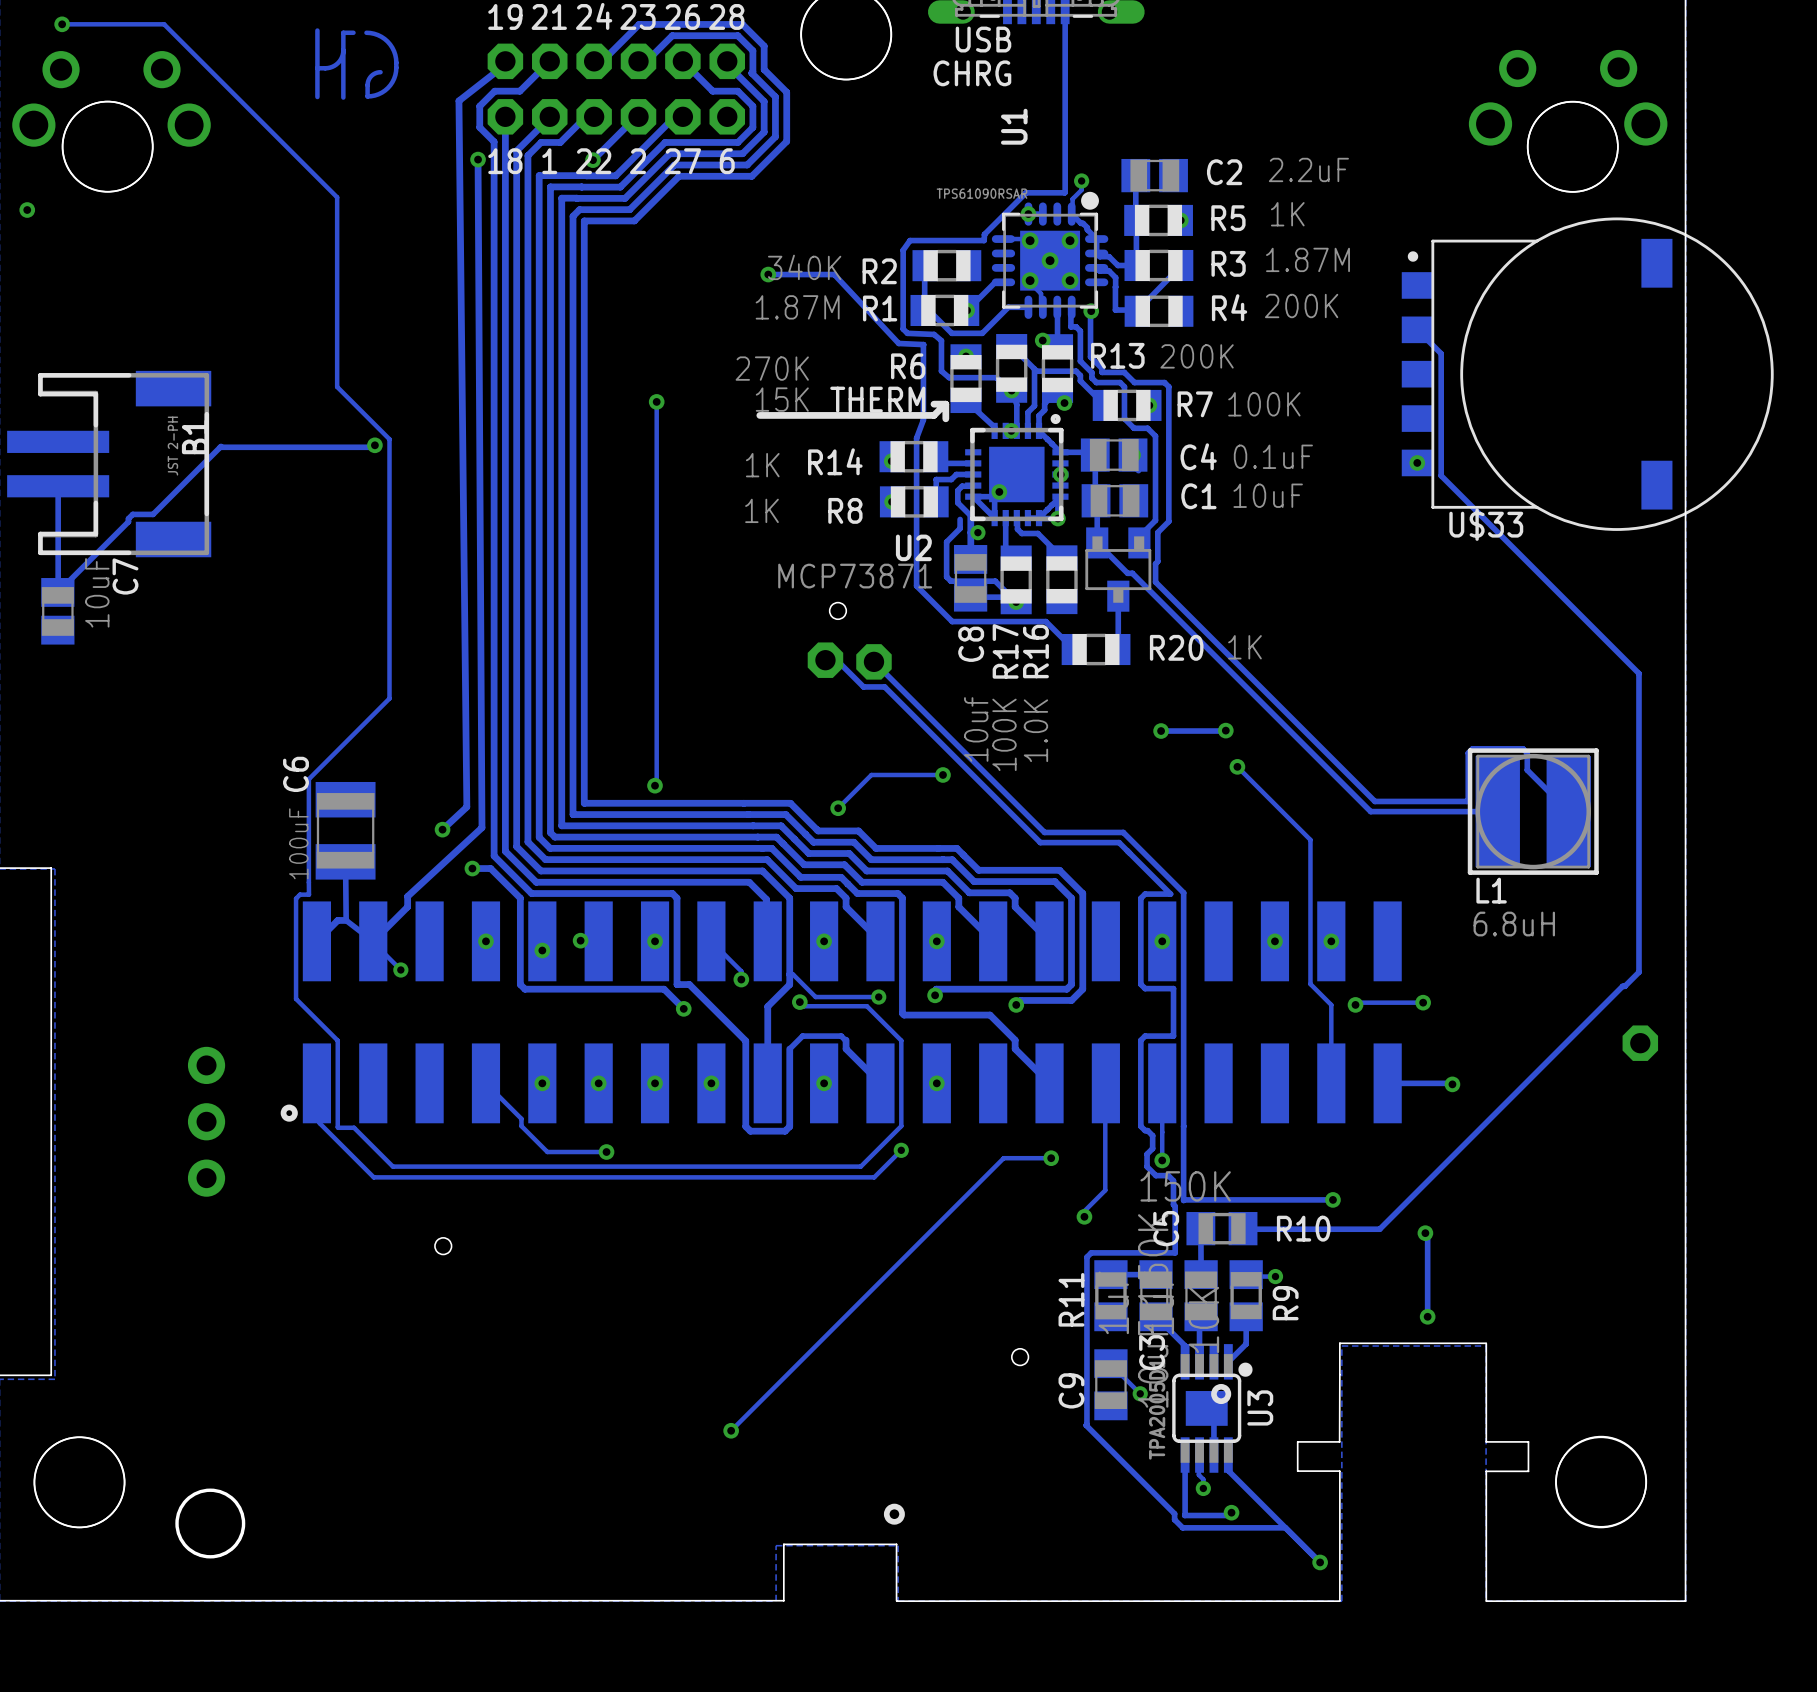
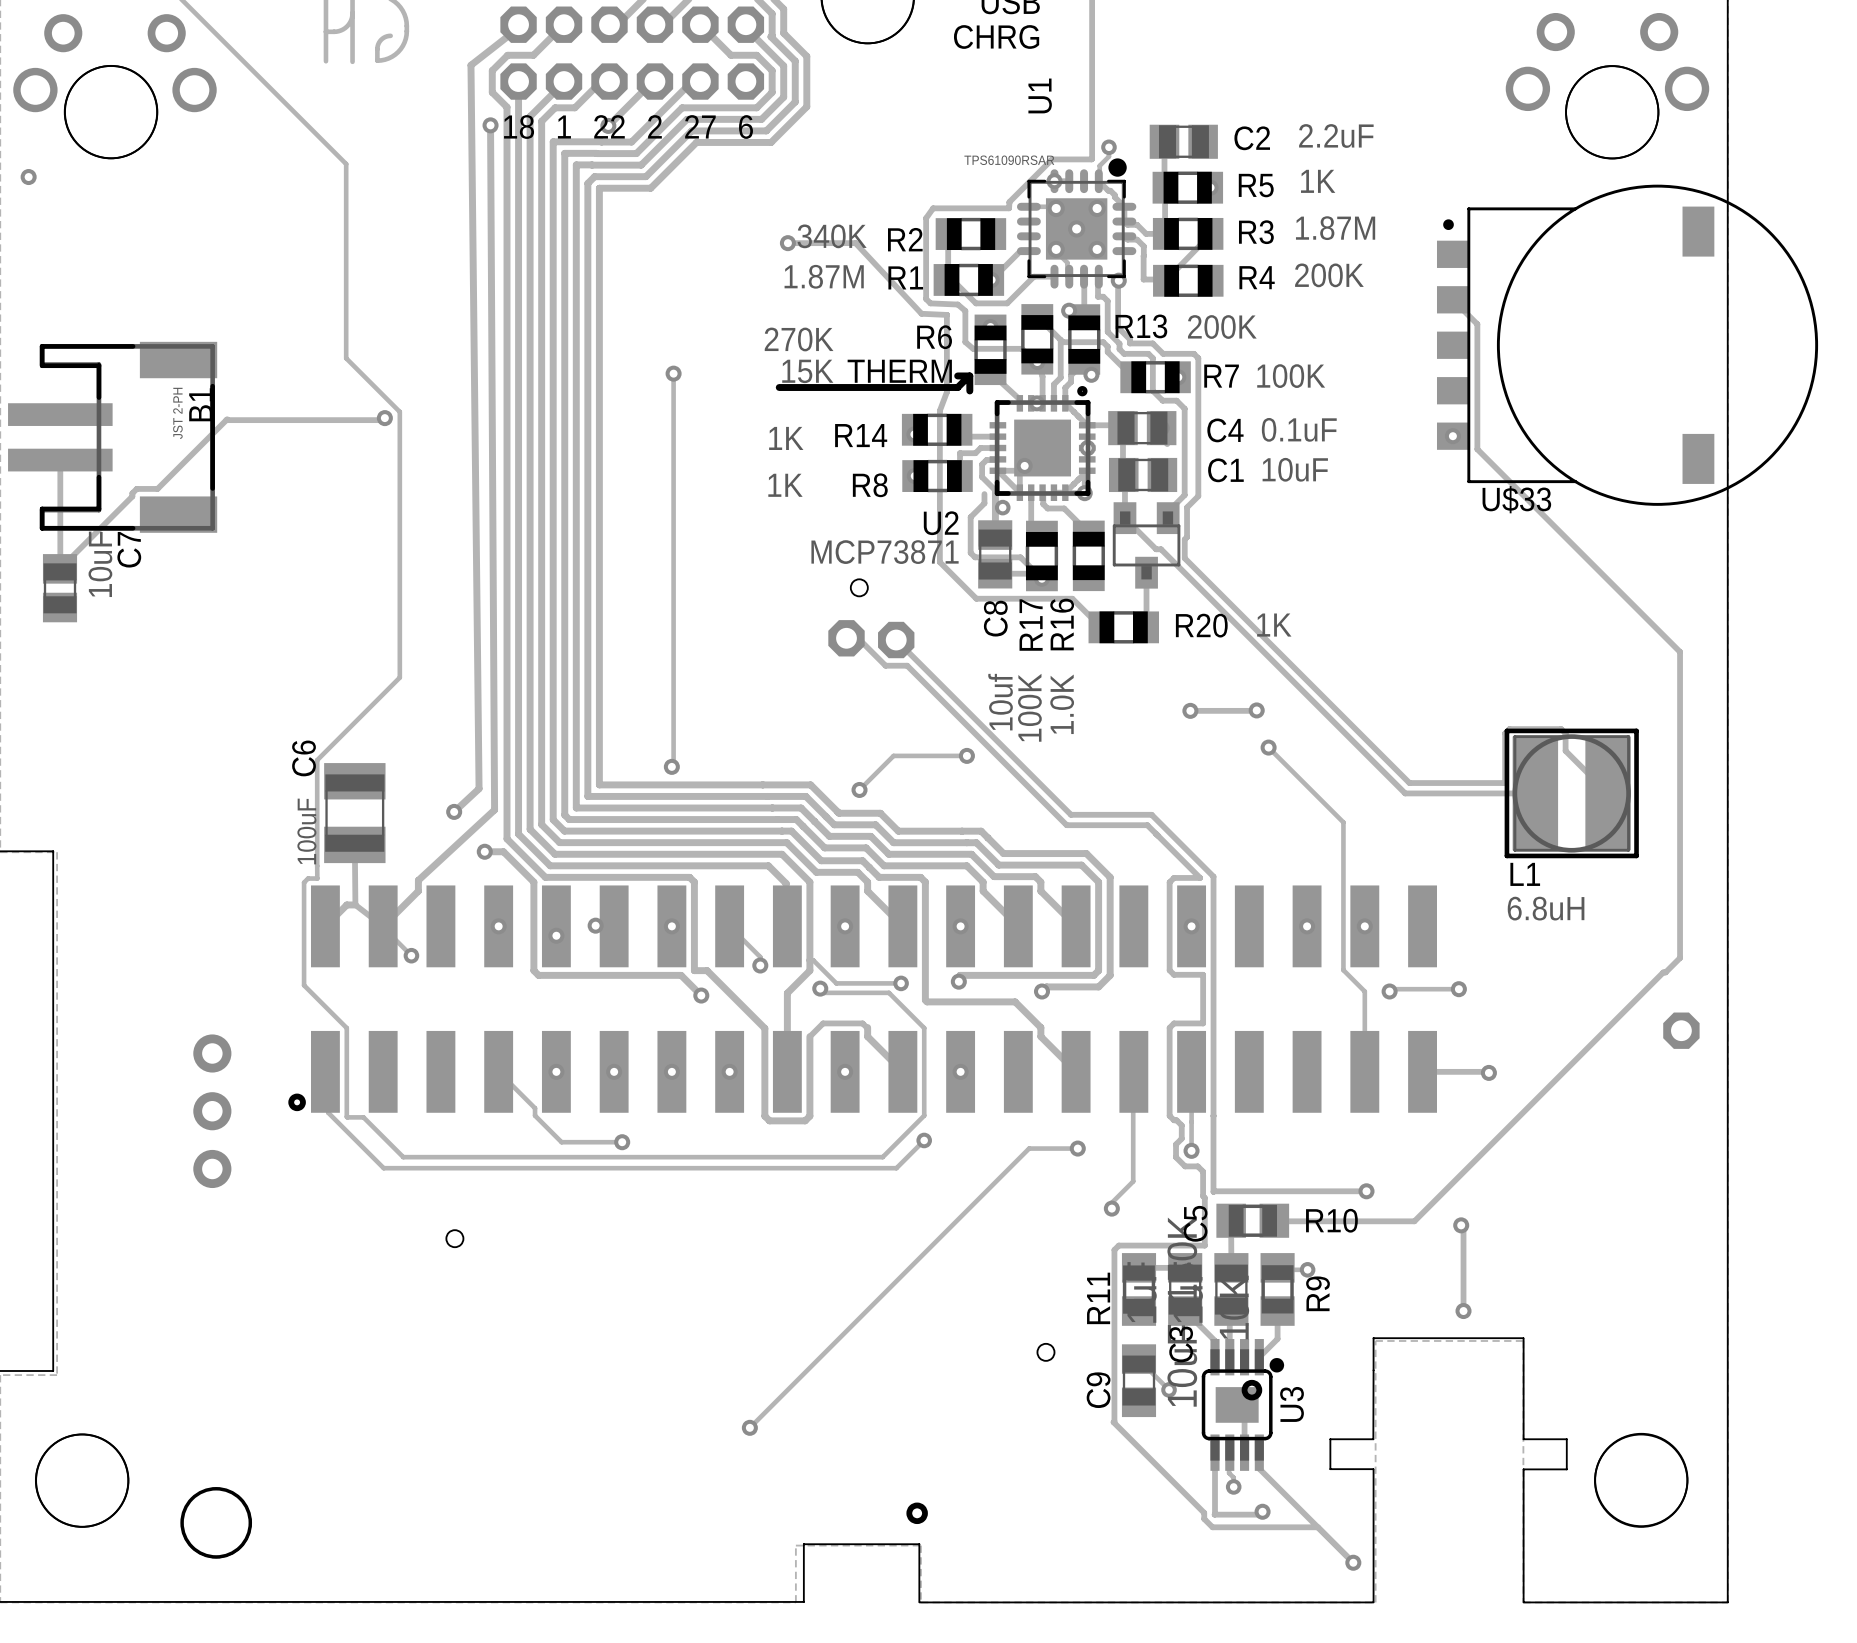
R10 value: 150K (1185, 1186) -> none
U3 value: TPA2005D1 (1157, 1409) -> none

